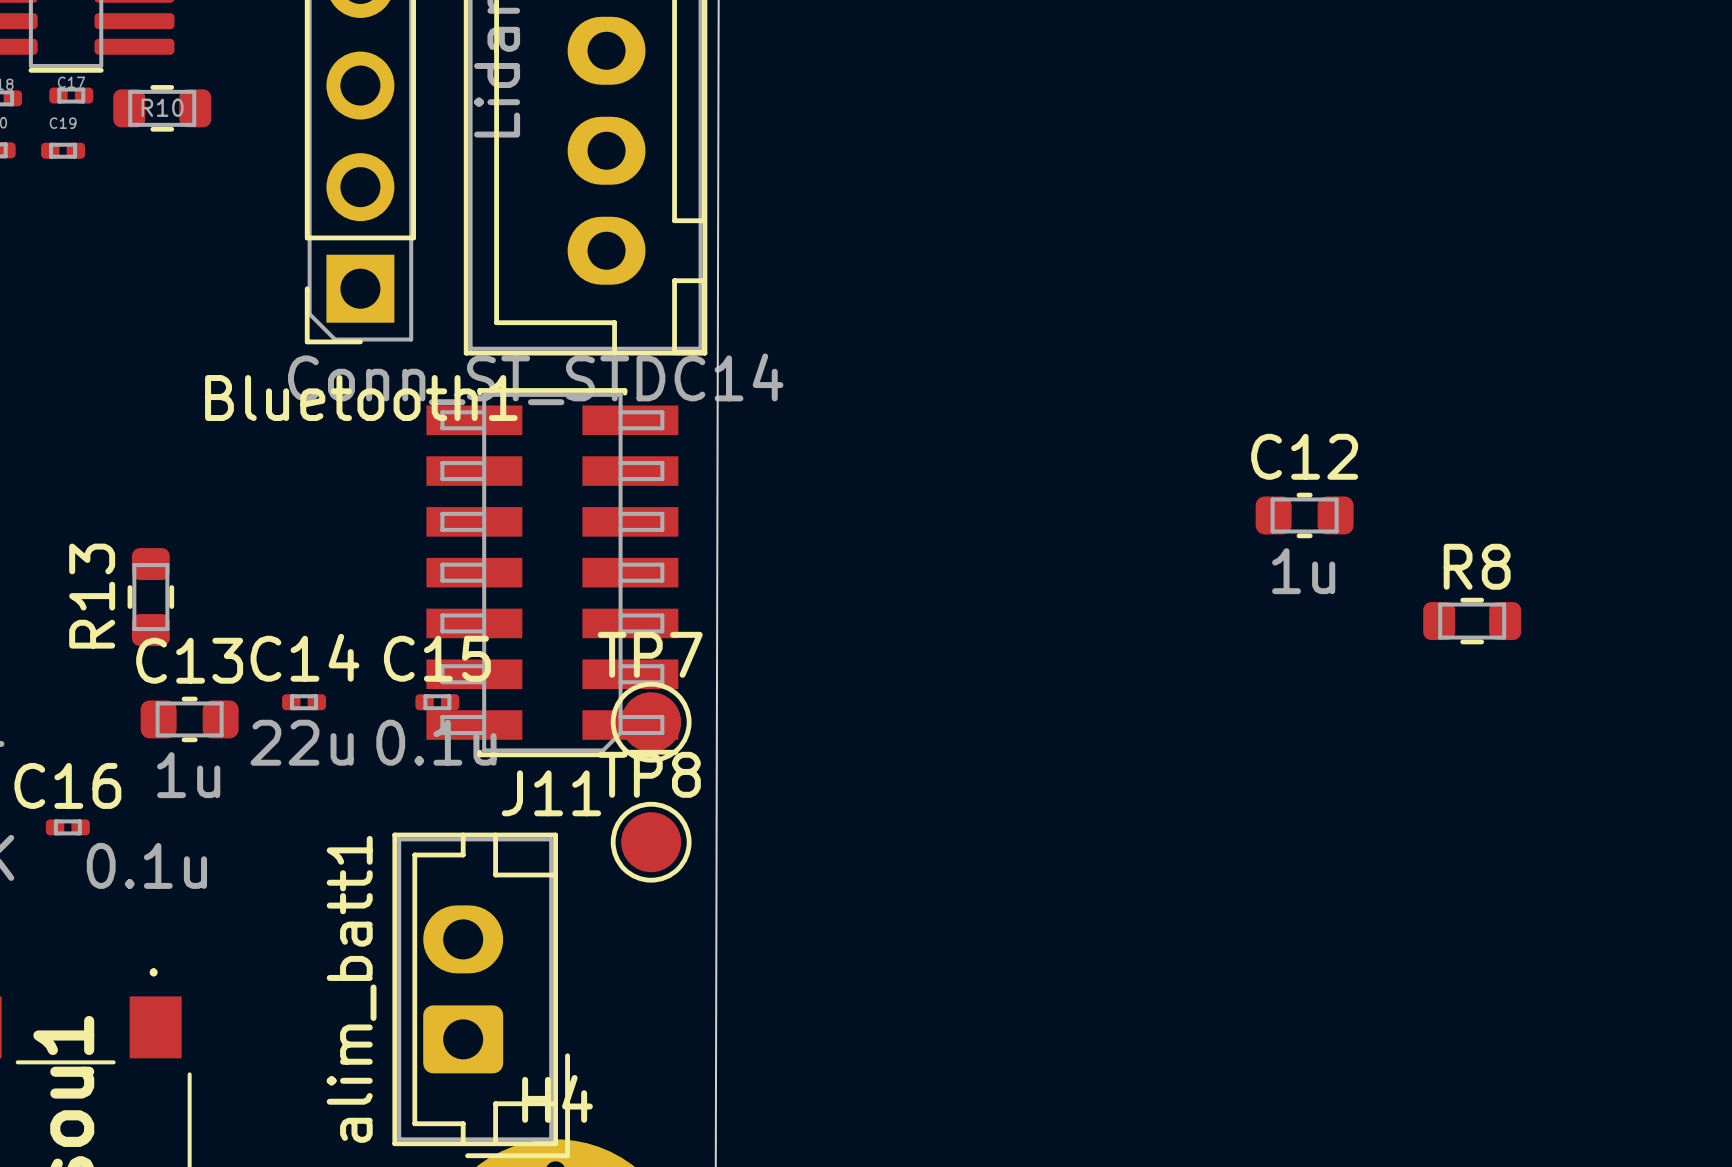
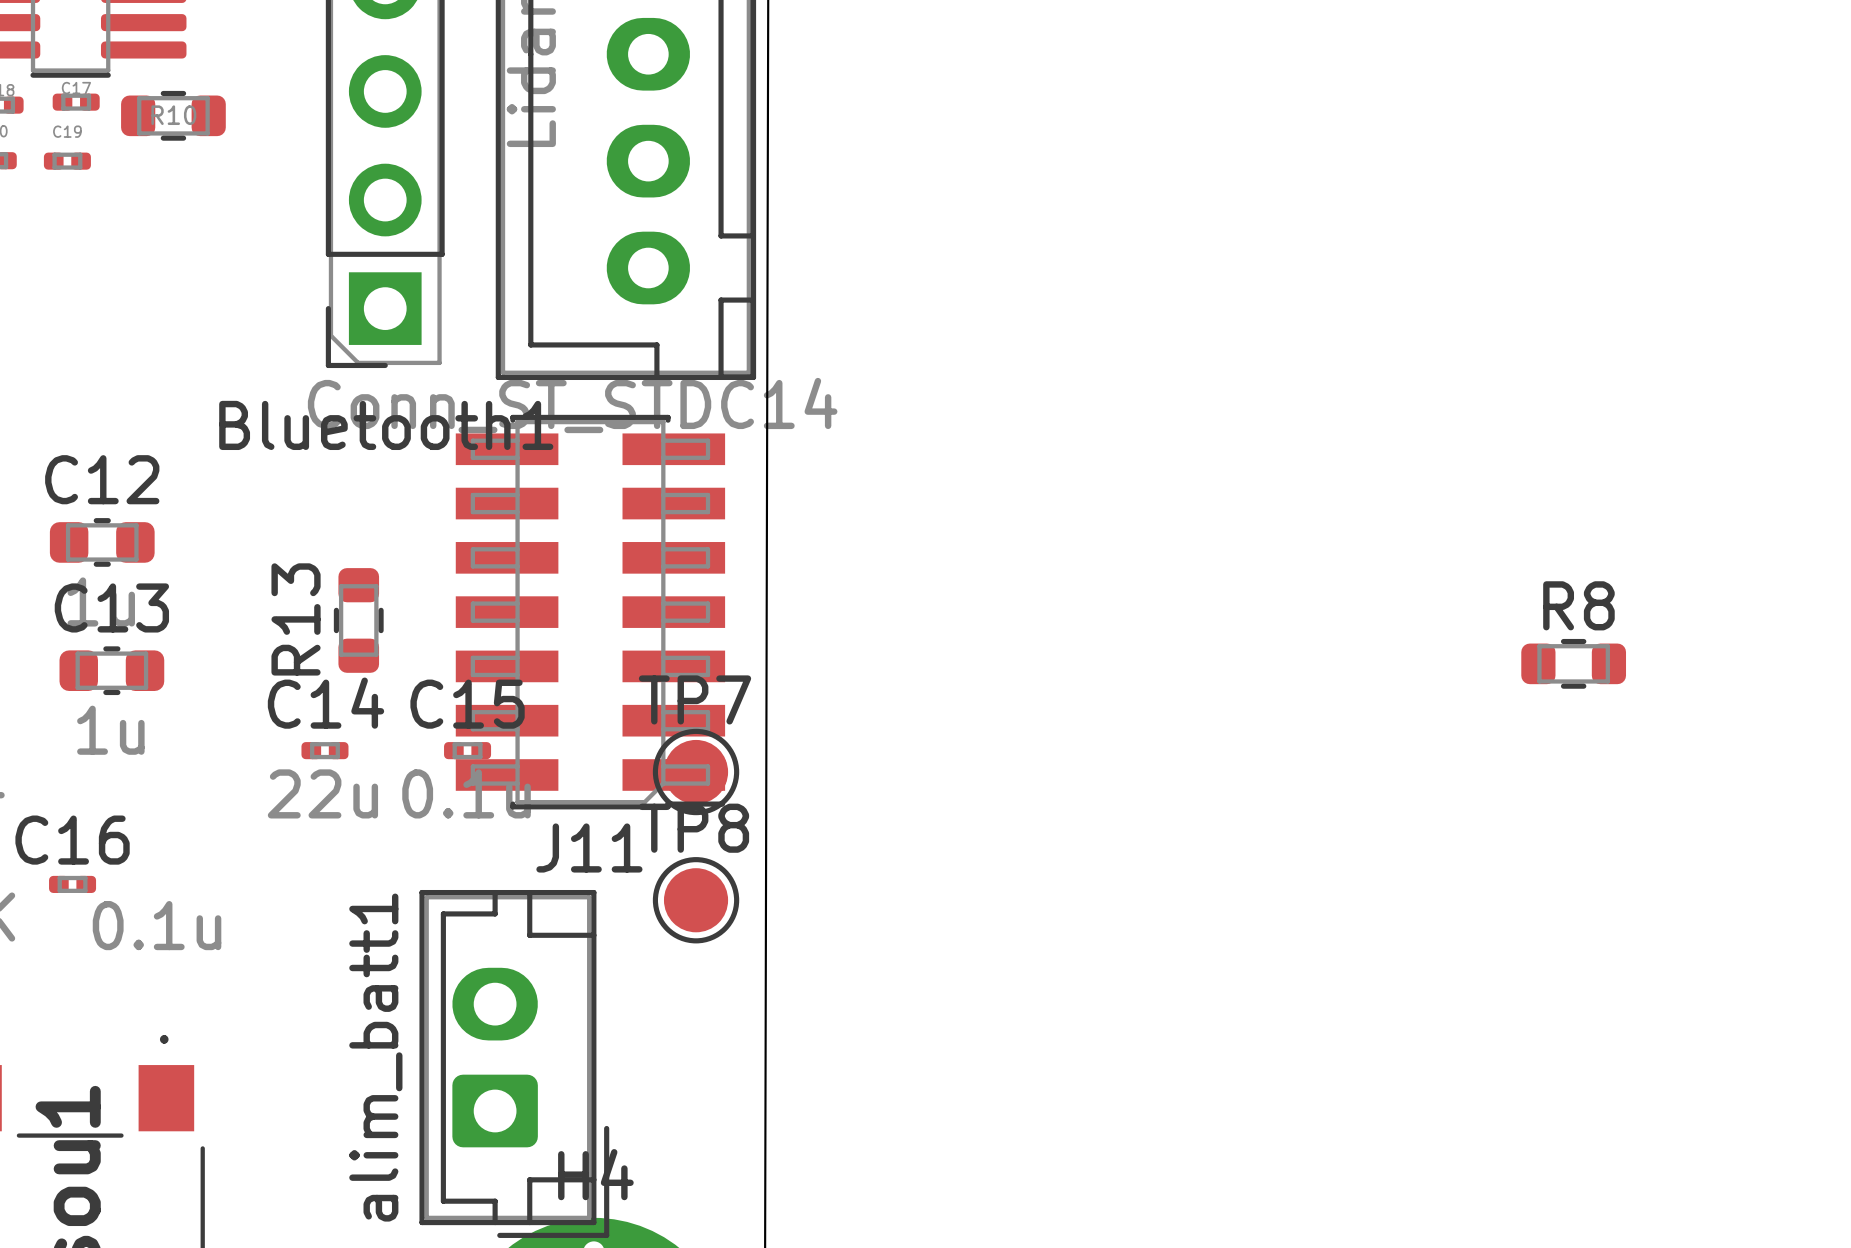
C12 position: (1304, 515) -> (102, 542)
R13 position: (150, 597) -> (358, 620)
C13 position: (189, 719) -> (111, 670)

